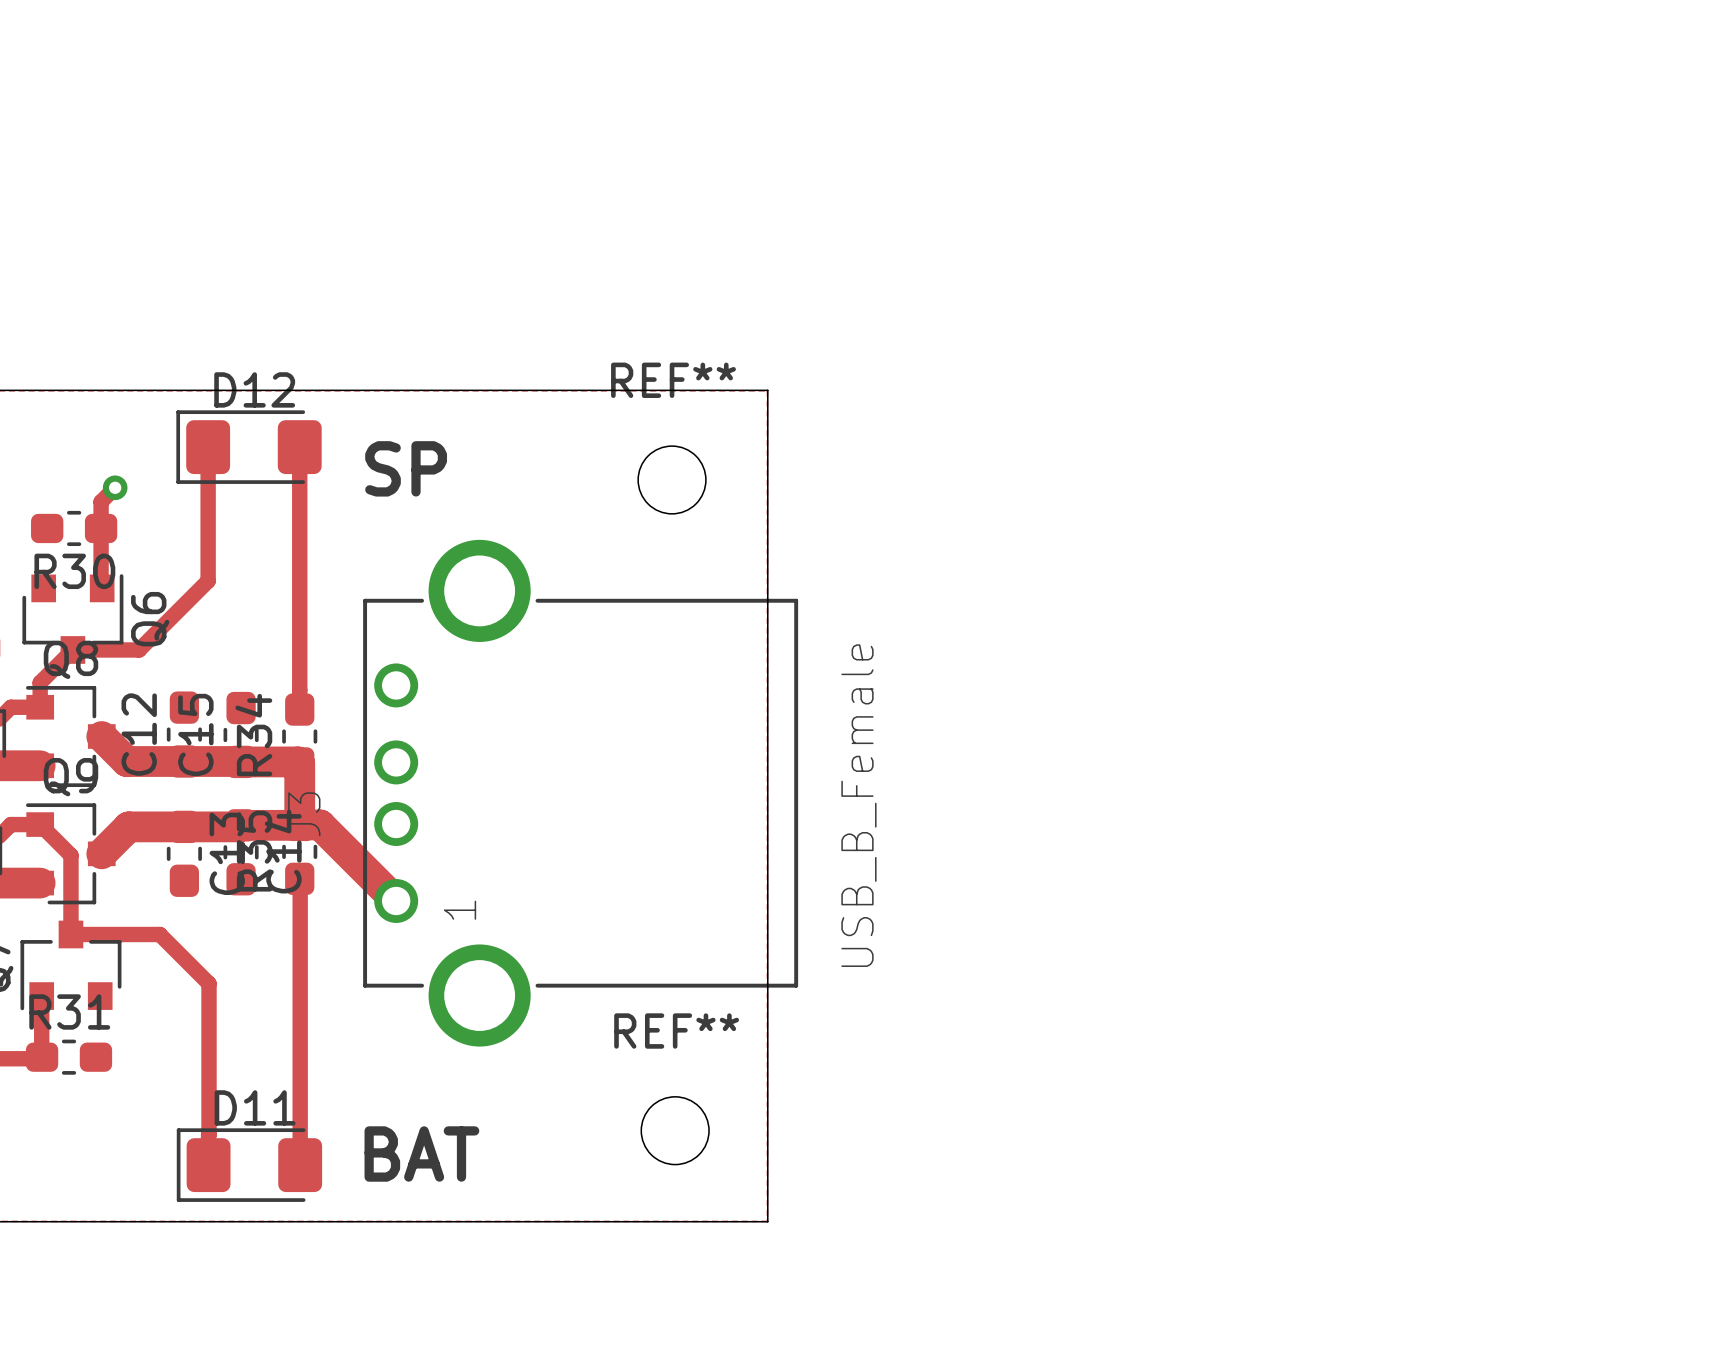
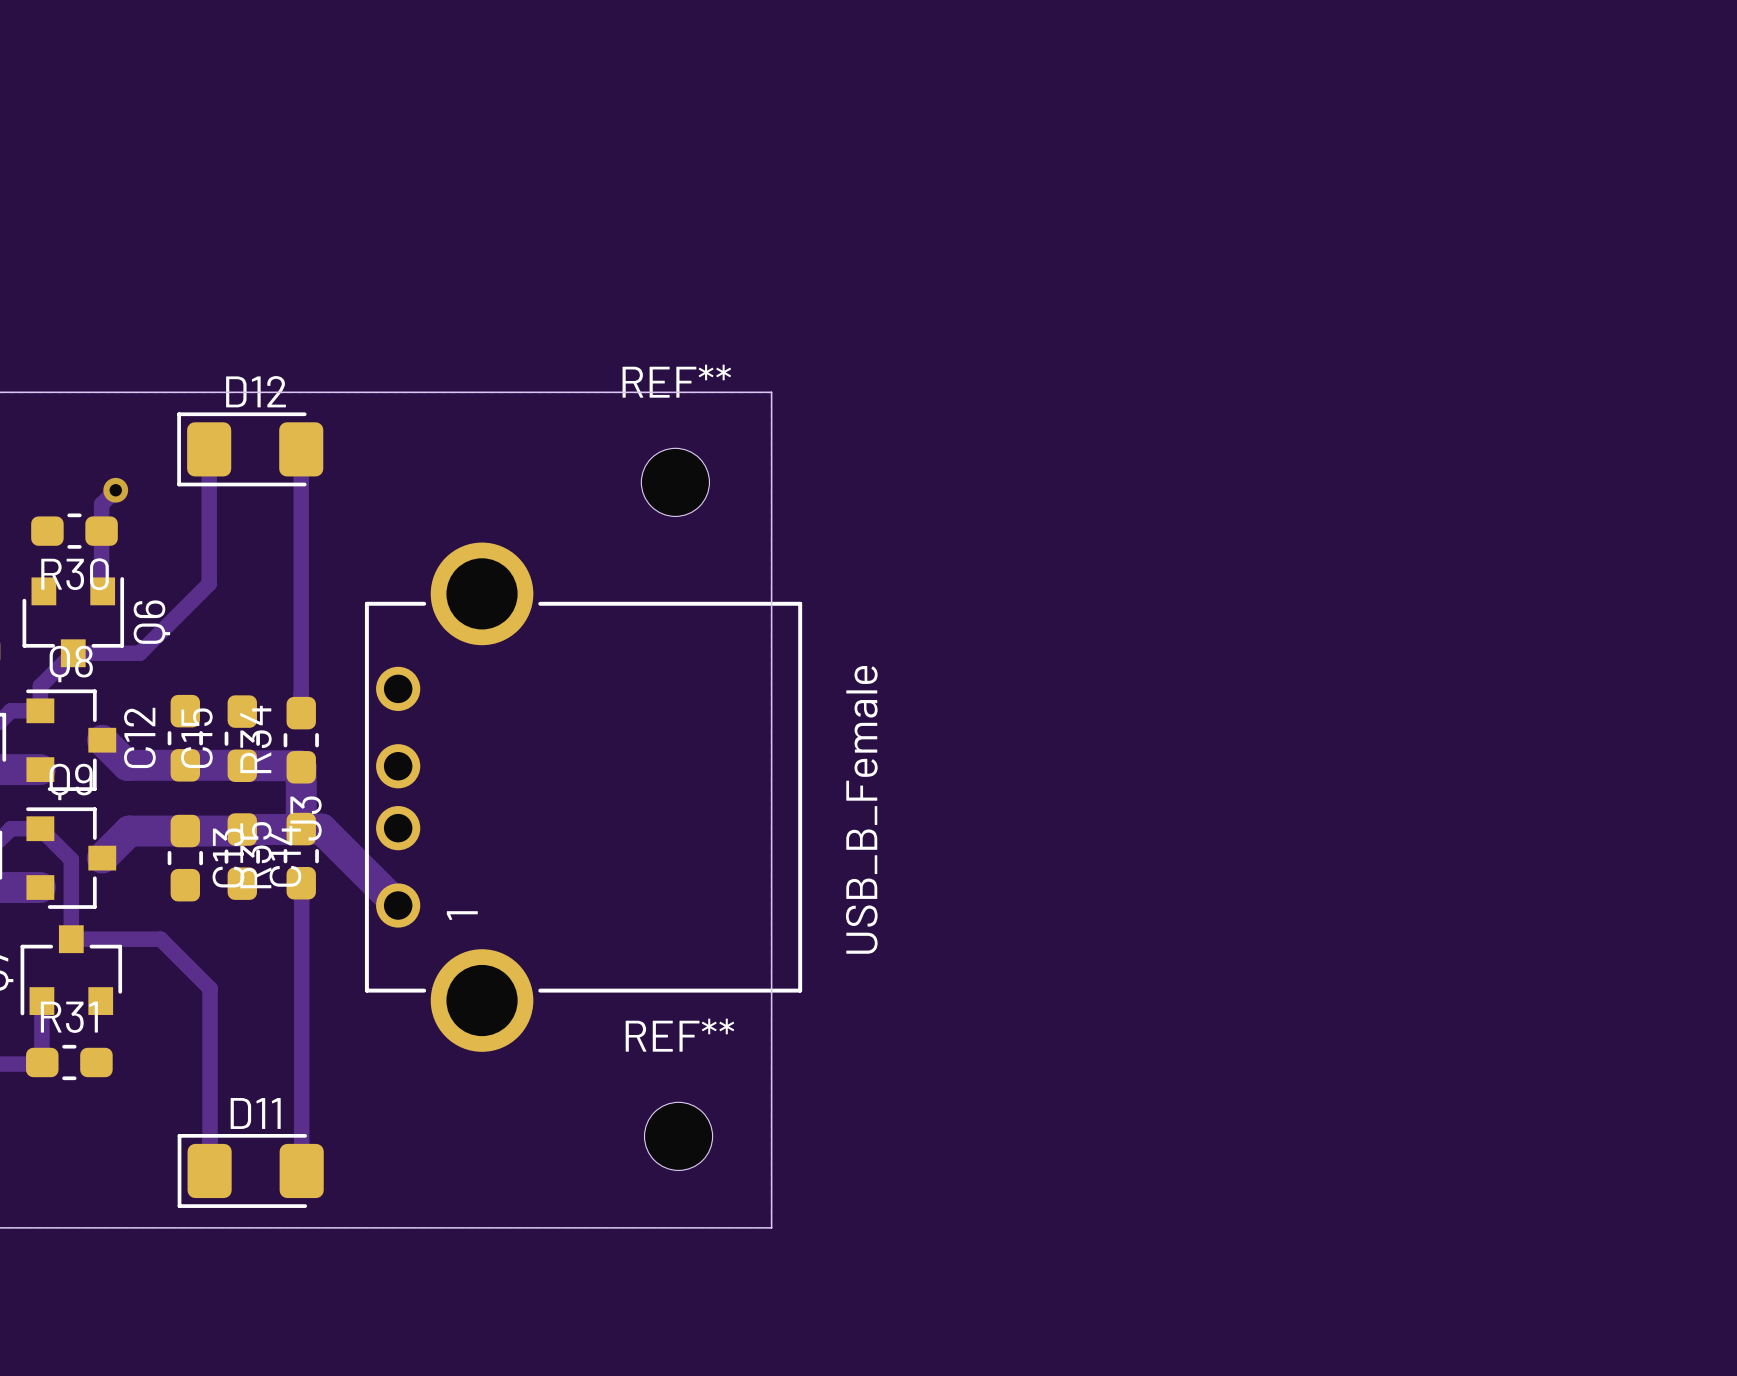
text: SP (406, 468) -> none
text: BAT (421, 1154) -> none

